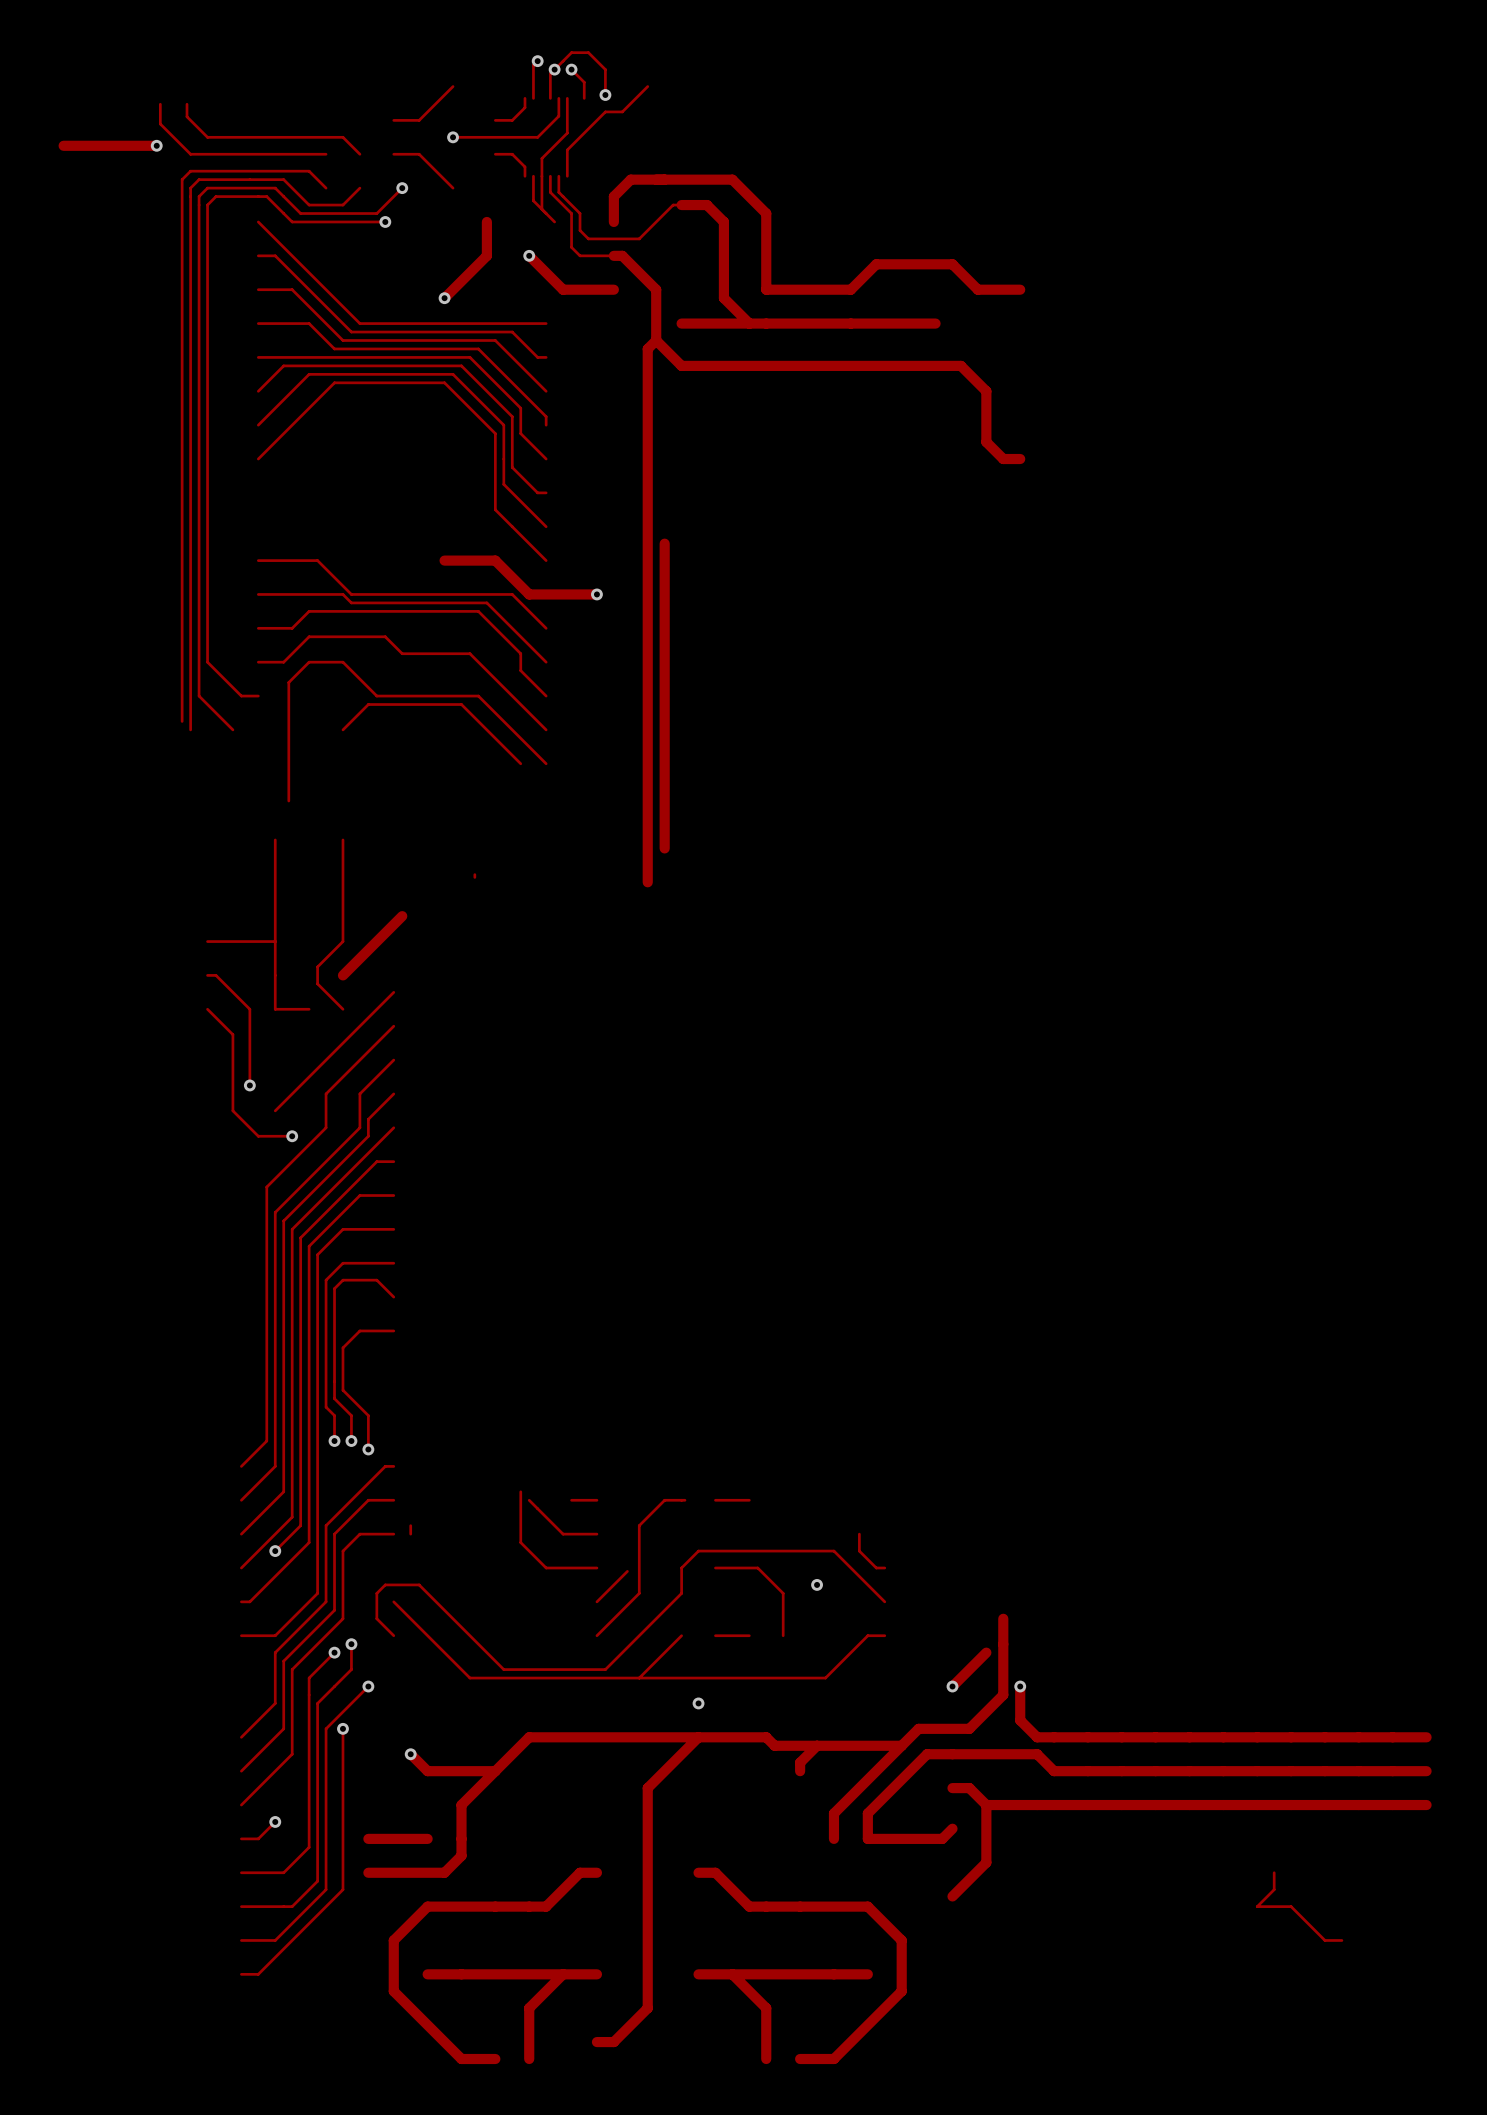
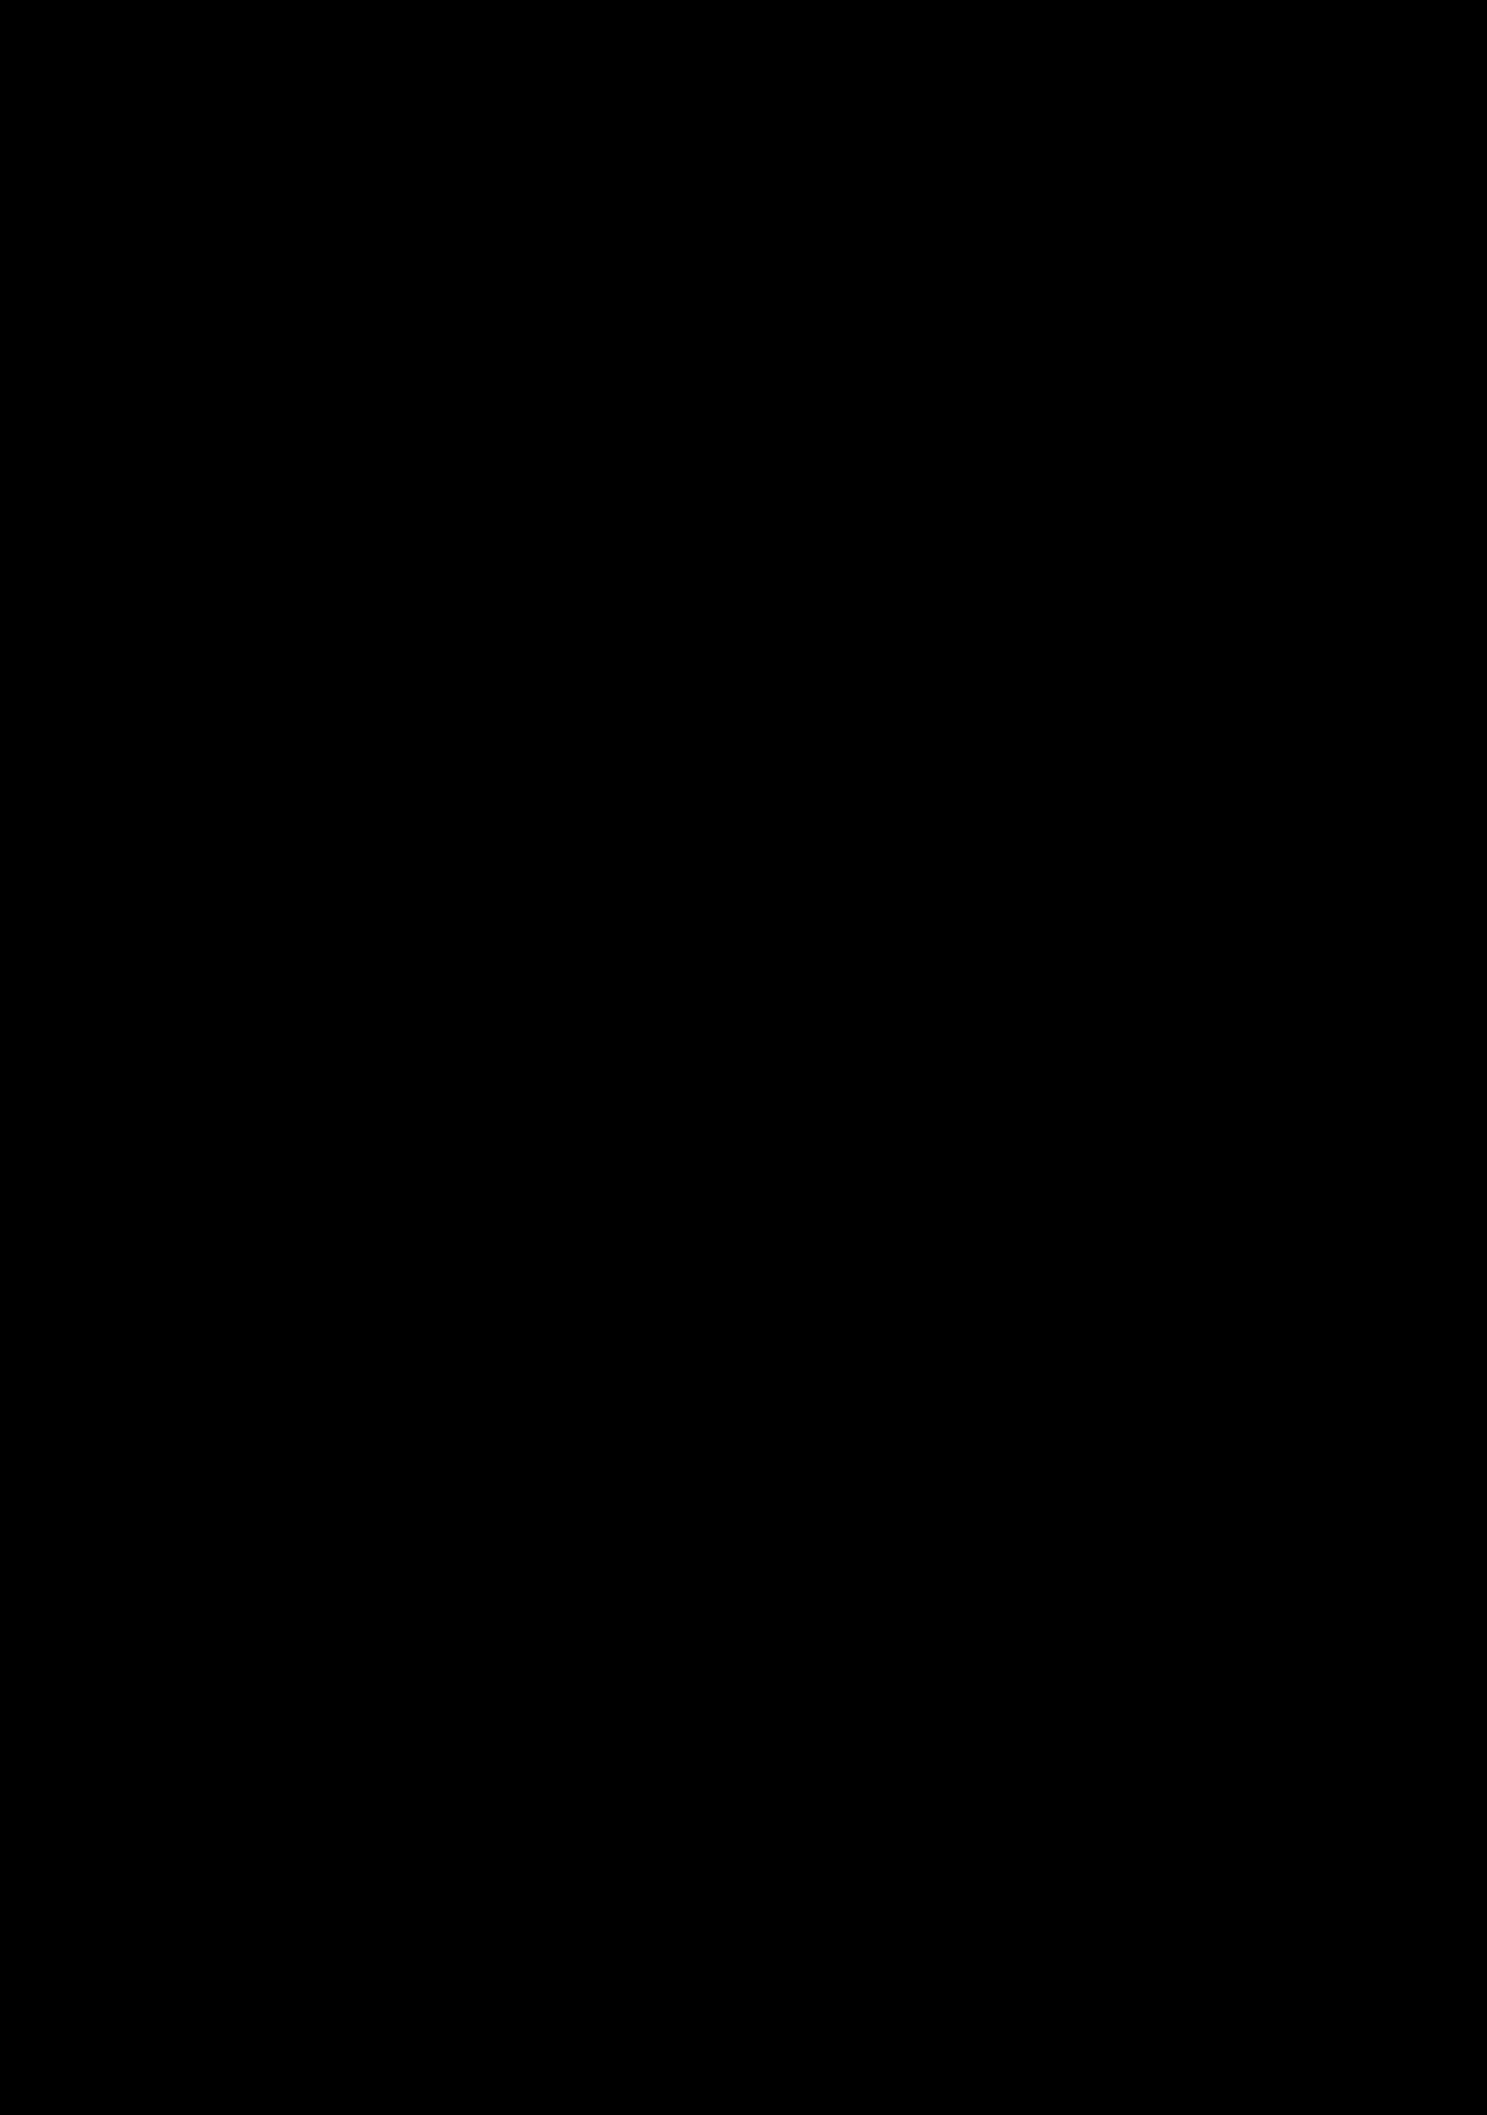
track: (537, 61) (533, 65) (533, 98) -> none
via: (537, 61) -> none
via: (554, 69) -> none
track: (571, 69) (584, 82) (584, 98) -> none
via: (571, 69) -> none
track: (453, 86) (419, 120) (393, 120) -> none
track: (647, 86) (622, 111) (605, 111) (567, 150) (567, 176) -> none
track: (605, 95) (605, 69) (588, 52) (571, 52) (550, 73) (550, 98) -> none
via: (605, 95) -> none
track: (524, 98) (524, 107) (512, 120) (495, 120) -> none
track: (558, 98) (558, 116) (537, 137) (453, 137) -> none
track: (567, 98) (567, 133) (541, 158) (541, 209) -> none
track: (160, 104) (160, 123) (190, 154) (326, 154) -> none
track: (187, 104) (187, 116) (207, 137) (342, 137) (359, 154) -> none
via: (453, 137) -> none
track: (63, 145) (156, 145) -> none
via: (156, 145) -> none
track: (393, 154) (419, 154) (453, 188) -> none
track: (495, 154) (512, 154) (524, 166) (524, 176) -> none
track: (533, 176) (533, 200) (554, 221) -> none
track: (550, 176) (550, 192) (571, 213) (571, 247) (580, 255) (622, 255) (656, 289) (656, 340) -> none
track: (558, 176) (558, 192) (580, 213) (580, 230) (588, 238) (639, 238) (673, 205) (707, 205) (723, 221) (723, 298) (749, 323) -> none
track: (326, 188) (309, 171) (190, 171) (182, 179) (182, 721) -> none
track: (359, 188) (342, 205) (309, 205) (283, 179) (199, 179) (190, 188) (190, 729) -> none
track: (402, 188) (376, 213) (300, 213) (275, 188) (207, 188) (199, 196) (199, 696) (232, 729) -> none
via: (402, 188) -> none
track: (258, 221) (359, 323) (546, 323) -> none
track: (385, 221) (292, 221) (266, 196) (216, 196) (207, 205) (207, 662) (241, 696) (258, 696) -> none
via: (385, 221) -> none
track: (486, 221) (486, 255) (444, 298) -> none
track: (613, 221) (613, 196) (630, 179) (732, 179) (766, 213) (766, 289) (850, 289) (876, 264) (952, 264) (977, 289) (1020, 289) -> none
track: (258, 255) (275, 255) (351, 332) (512, 332) (537, 357) (546, 357) -> none
track: (529, 255) (563, 289) (613, 289) -> none
via: (529, 255) -> none
track: (258, 289) (292, 289) (342, 340) (495, 340) (546, 391) -> none
via: (444, 298) -> none
track: (258, 323) (309, 323) (334, 348) (478, 348) (546, 416) (546, 425) -> none
track: (681, 323) (935, 323) -> none
track: (656, 340) (647, 348) (647, 882) -> none
track: (656, 340) (681, 365) (960, 365) (986, 391) (986, 442) (1003, 459) (1020, 459) -> none
track: (258, 357) (469, 357) (520, 408) (520, 433) (546, 459) -> none
track: (258, 391) (283, 365) (461, 365) (512, 416) (512, 467) (537, 492) (546, 492) -> none
track: (258, 425) (309, 374) (453, 374) (503, 425) (503, 484) (546, 526) -> none
track: (258, 459) (334, 382) (444, 382) (495, 433) (495, 509) (546, 560) -> none
track: (664, 543) (664, 848) -> none
track: (258, 560) (317, 560) (351, 594) (512, 594) (546, 628) -> none
track: (444, 560) (495, 560) (529, 594) (596, 594) -> none
track: (258, 594) (342, 594) (351, 602) (486, 602) (546, 662) -> none
via: (596, 594) -> none
track: (258, 628) (292, 628) (309, 611) (478, 611) (520, 653) (520, 670) (546, 696) -> none
track: (258, 662) (283, 662) (309, 636) (385, 636) (402, 653) (469, 653) (546, 729) -> none
track: (342, 729) (368, 704) (461, 704) (520, 763) -> none
track: (546, 763) (478, 696) (376, 696) (342, 662) (309, 662) (288, 682) (288, 801) -> none
track: (275, 839) (275, 1009) (309, 1009) -> none
track: (342, 839) (342, 941) (317, 966) (317, 983) (342, 1009) -> none
track: (474, 874) (474, 877) -> none
track: (402, 916) (342, 975) -> none
track: (207, 941) (275, 941) -> none
track: (207, 975) (216, 975) (249, 1009) (249, 1085) -> none
track: (393, 992) (275, 1110) -> none
track: (207, 1009) (232, 1034) (232, 1110) (258, 1136) (292, 1136) -> none
track: (393, 1026) (326, 1093) (326, 1127) (266, 1187) (266, 1441) (241, 1466) -> none
track: (393, 1060) (359, 1093) (359, 1127) (275, 1212) (275, 1466) (241, 1500) -> none
via: (249, 1085) -> none
track: (393, 1093) (368, 1119) (368, 1136) (283, 1220) (283, 1491) (241, 1534) -> none
track: (393, 1127) (292, 1229) (292, 1517) (241, 1568) -> none
via: (292, 1136) -> none
track: (393, 1161) (376, 1161) (300, 1237) (300, 1525) (275, 1551) -> none
track: (393, 1195) (359, 1195) (309, 1246) (309, 1542) (249, 1601) (241, 1601) -> none
track: (393, 1229) (342, 1229) (317, 1254) (317, 1593) (275, 1635) (241, 1635) -> none
track: (393, 1263) (342, 1263) (326, 1280) (326, 1407) (334, 1415) (334, 1441) -> none
track: (393, 1297) (376, 1280) (342, 1280) (334, 1288) (334, 1398) (351, 1415) (351, 1441) -> none
track: (393, 1330) (359, 1330) (342, 1347) (342, 1390) (368, 1415) (368, 1449) -> none
via: (334, 1441) -> none
via: (351, 1441) -> none
via: (368, 1449) -> none
track: (393, 1466) (385, 1466) (326, 1525) (326, 1601) (275, 1652) (275, 1703) (241, 1737) -> none
track: (520, 1491) (520, 1542) (546, 1568) (596, 1568) -> none
track: (393, 1500) (368, 1500) (334, 1534) (334, 1610) (283, 1661) (283, 1728) (241, 1771) -> none
track: (529, 1500) (563, 1534) (596, 1534) -> none
track: (571, 1500) (596, 1500) -> none
track: (684, 1500) (664, 1500) (639, 1525) (639, 1593) (596, 1635) -> none
track: (715, 1500) (749, 1500) -> none
track: (410, 1525) (410, 1534) -> none
track: (393, 1534) (359, 1534) (342, 1551) (342, 1618) (292, 1669) (292, 1754) (241, 1805) -> none
track: (859, 1534) (859, 1551) (876, 1568) (884, 1568) -> none
via: (275, 1551) -> none
track: (715, 1568) (757, 1568) (783, 1593) (783, 1635) -> none
track: (627, 1571) (596, 1601) -> none
via: (817, 1584) -> none
track: (393, 1601) (469, 1678) (825, 1678) (867, 1635) (884, 1635) -> none
track: (884, 1601) (833, 1551) (698, 1551) (681, 1568) (681, 1593) (605, 1669) (503, 1669) (419, 1584) (385, 1584) (376, 1593) (376, 1618) (393, 1635) -> none
track: (1003, 1618) (1003, 1694) (969, 1728) (918, 1728) (833, 1813) (833, 1838) -> none
track: (681, 1635) (639, 1678) -> none
track: (715, 1635) (749, 1635) -> none
track: (351, 1644) (351, 1669) (317, 1703) (317, 1881) (292, 1906) (241, 1906) -> none
via: (351, 1644) -> none
track: (334, 1652) (309, 1678) (309, 1847) (283, 1872) (241, 1872) -> none
via: (334, 1652) -> none
track: (986, 1652) (952, 1686) -> none
track: (368, 1686) (326, 1728) (326, 1889) (275, 1940) (241, 1940) -> none
via: (368, 1686) -> none
via: (952, 1686) -> none
track: (1020, 1686) (1020, 1720) (1037, 1737) (1426, 1737) -> none
via: (1020, 1686) -> none
via: (698, 1703) -> none
track: (342, 1728) (342, 1889) (258, 1974) (241, 1974) -> none
via: (342, 1728) -> none
track: (698, 1737) (647, 1788) (647, 2008) (613, 2042) (596, 2042) -> none
track: (817, 1745) (800, 1762) (800, 1771) -> none
track: (901, 1745) (774, 1745) (766, 1737) (529, 1737) (461, 1805) (461, 1855) (444, 1872) (368, 1872) -> none
track: (410, 1754) (427, 1771) (495, 1771) -> none
via: (410, 1754) -> none
track: (1426, 1771) (1054, 1771) (1037, 1754) (927, 1754) (867, 1813) (867, 1838) (942, 1838) (952, 1828) -> none
track: (952, 1788) (969, 1788) (986, 1805) -> none
track: (986, 1805) (986, 1862) (952, 1896) -> none
track: (986, 1805) (1426, 1805) -> none
track: (275, 1821) (258, 1838) (241, 1838) -> none
via: (275, 1821) -> none
track: (368, 1838) (427, 1838) (419, 1838) -> none
track: (596, 1872) (580, 1872) (546, 1906) (427, 1906) (393, 1940) (393, 1991) (461, 2058) (495, 2058) -> none
track: (698, 1872) (715, 1872) (749, 1906) (867, 1906) (901, 1940) (901, 1991) (833, 2058) (800, 2058) -> none
track: (1274, 1872) (1274, 1889) (1257, 1906) (1291, 1906) (1324, 1940) (1341, 1940) -> none
track: (427, 1974) (596, 1974) -> none
track: (563, 1974) (529, 2008) (529, 2058) -> none
track: (698, 1974) (867, 1974) -> none
track: (732, 1974) (766, 2008) (766, 2058) -> none

